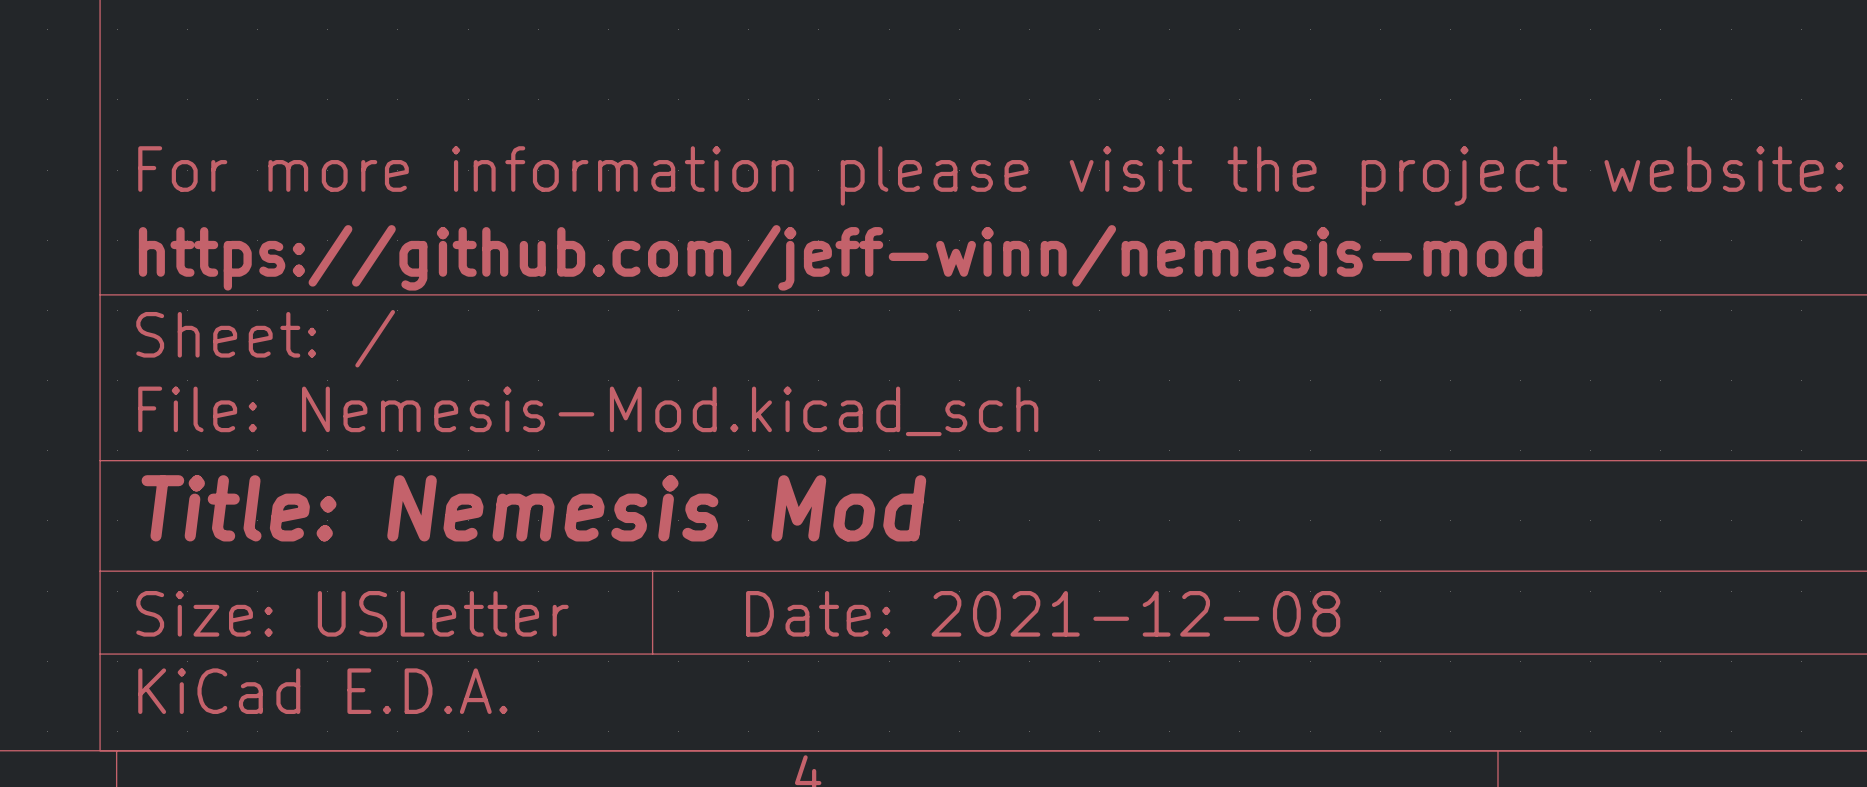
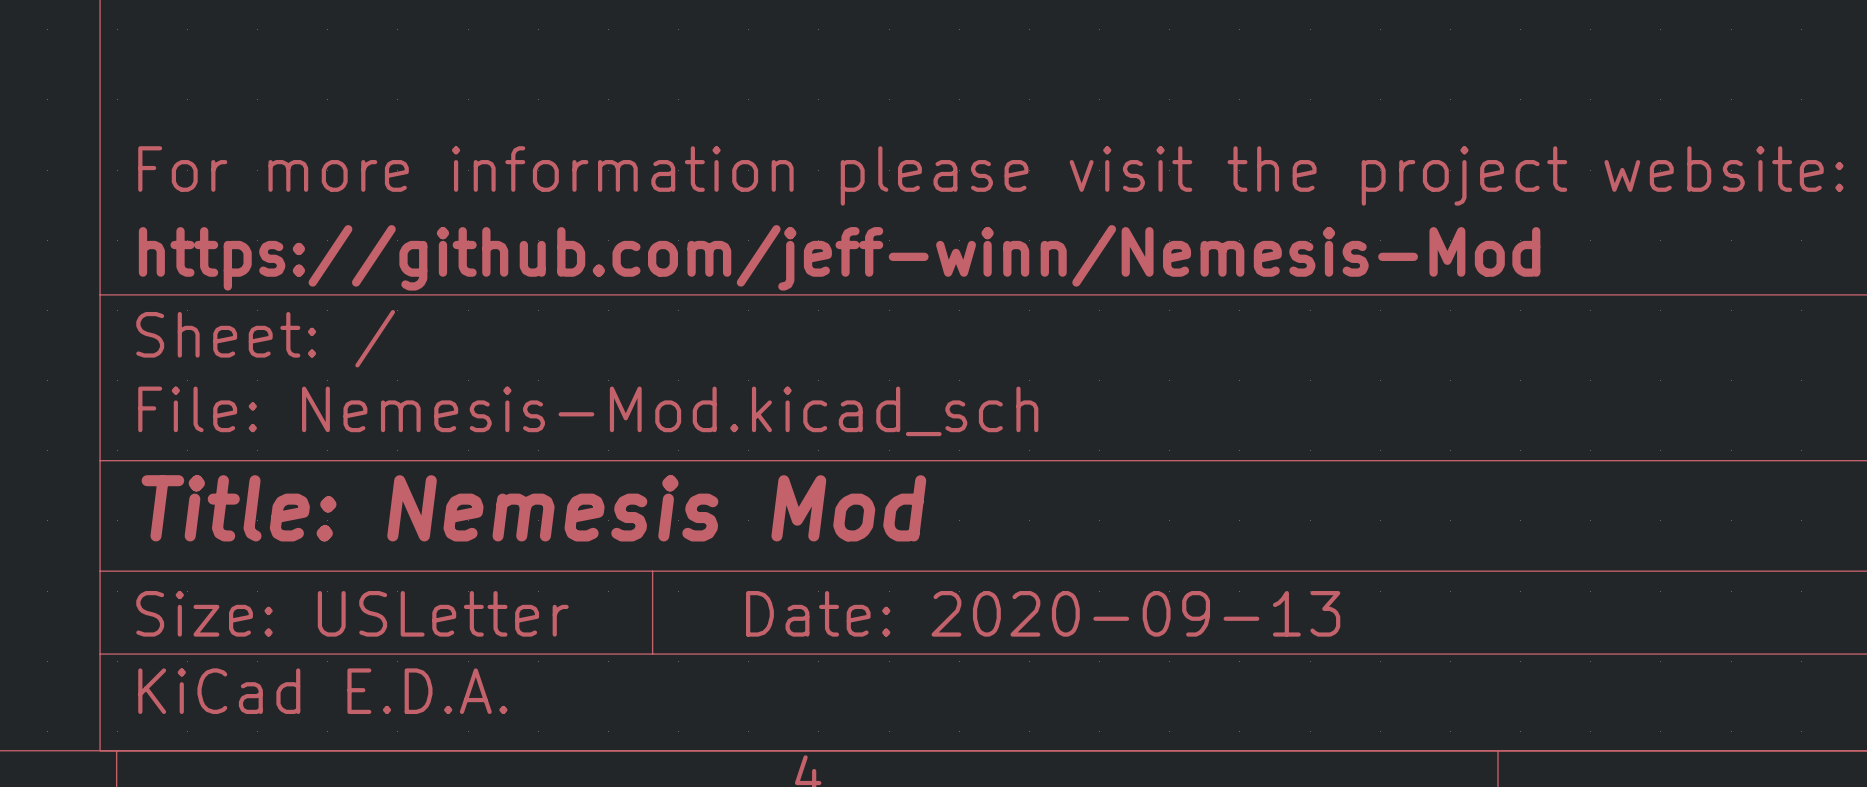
title block: https://github.com/jeff-winn/nemesis-mod (840, 257) -> https://github.com/jeff-winn/Nemesis-Mod (839, 257)
title block: Date: 2021-12-08 (1043, 613) -> Date: 2020-09-13 (1043, 613)

